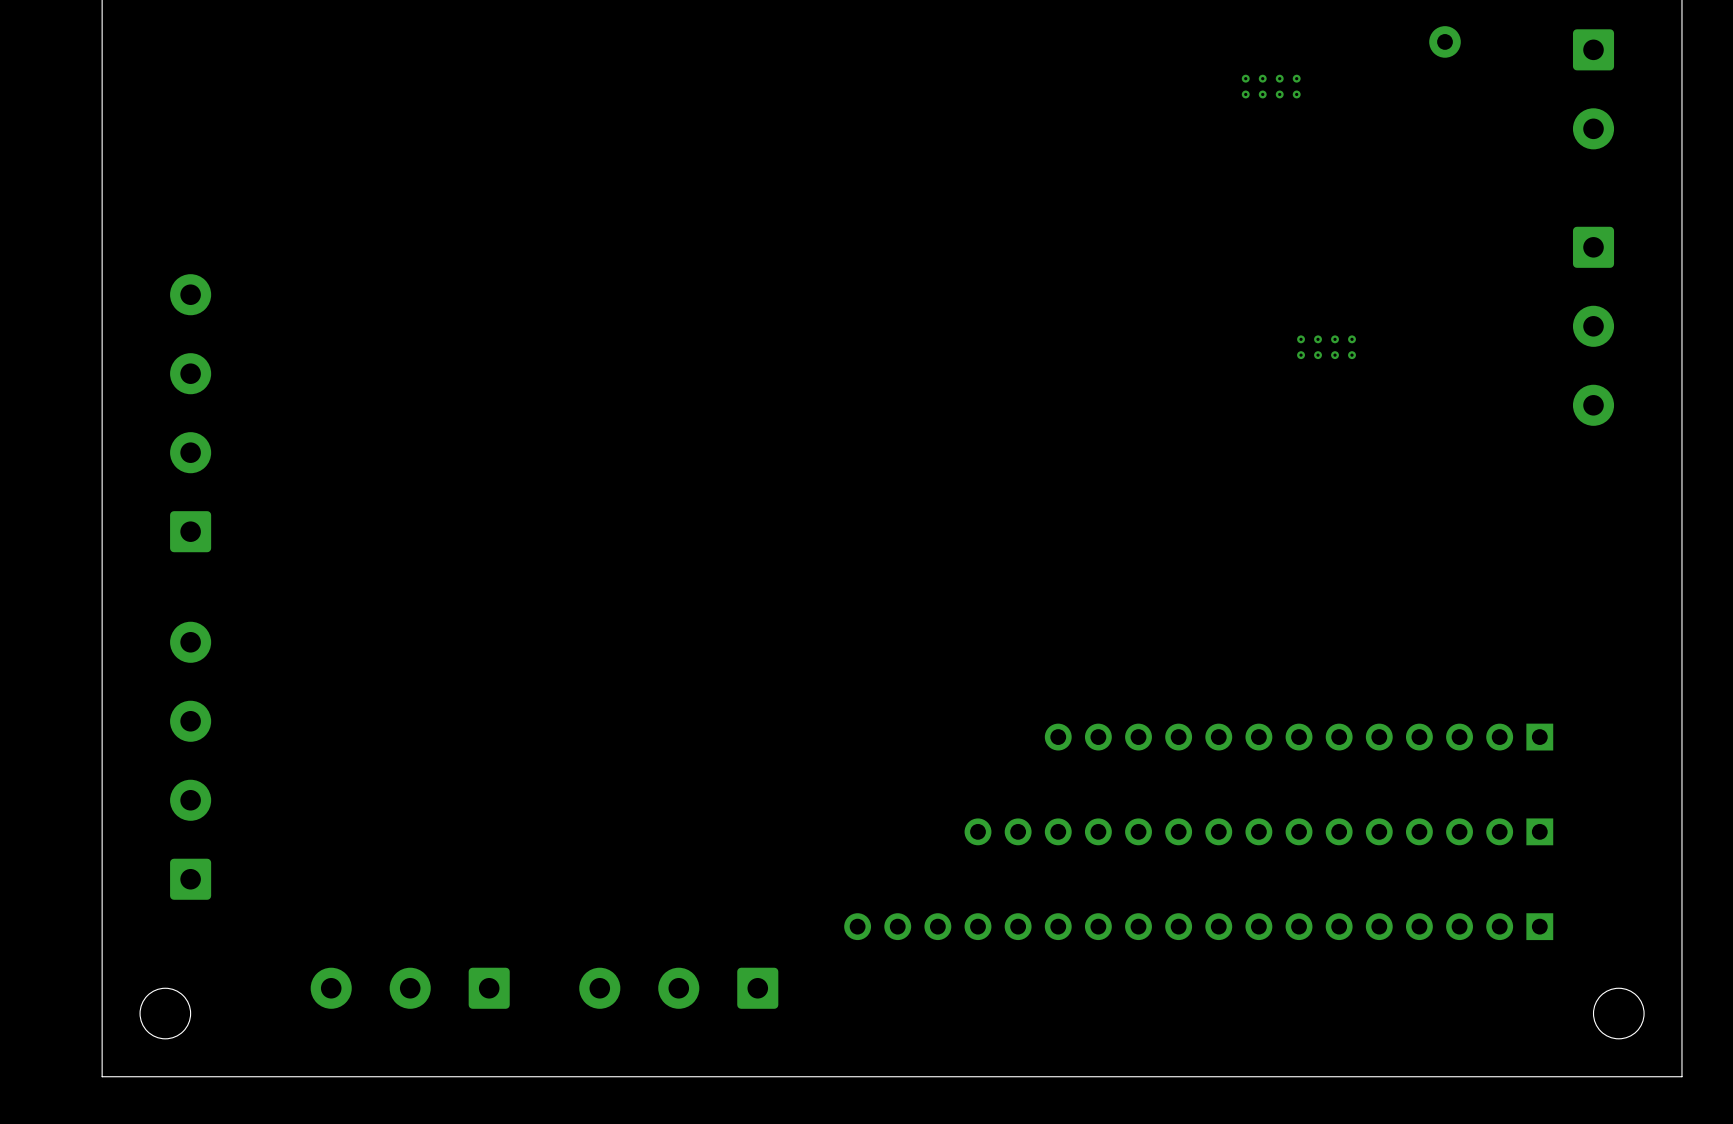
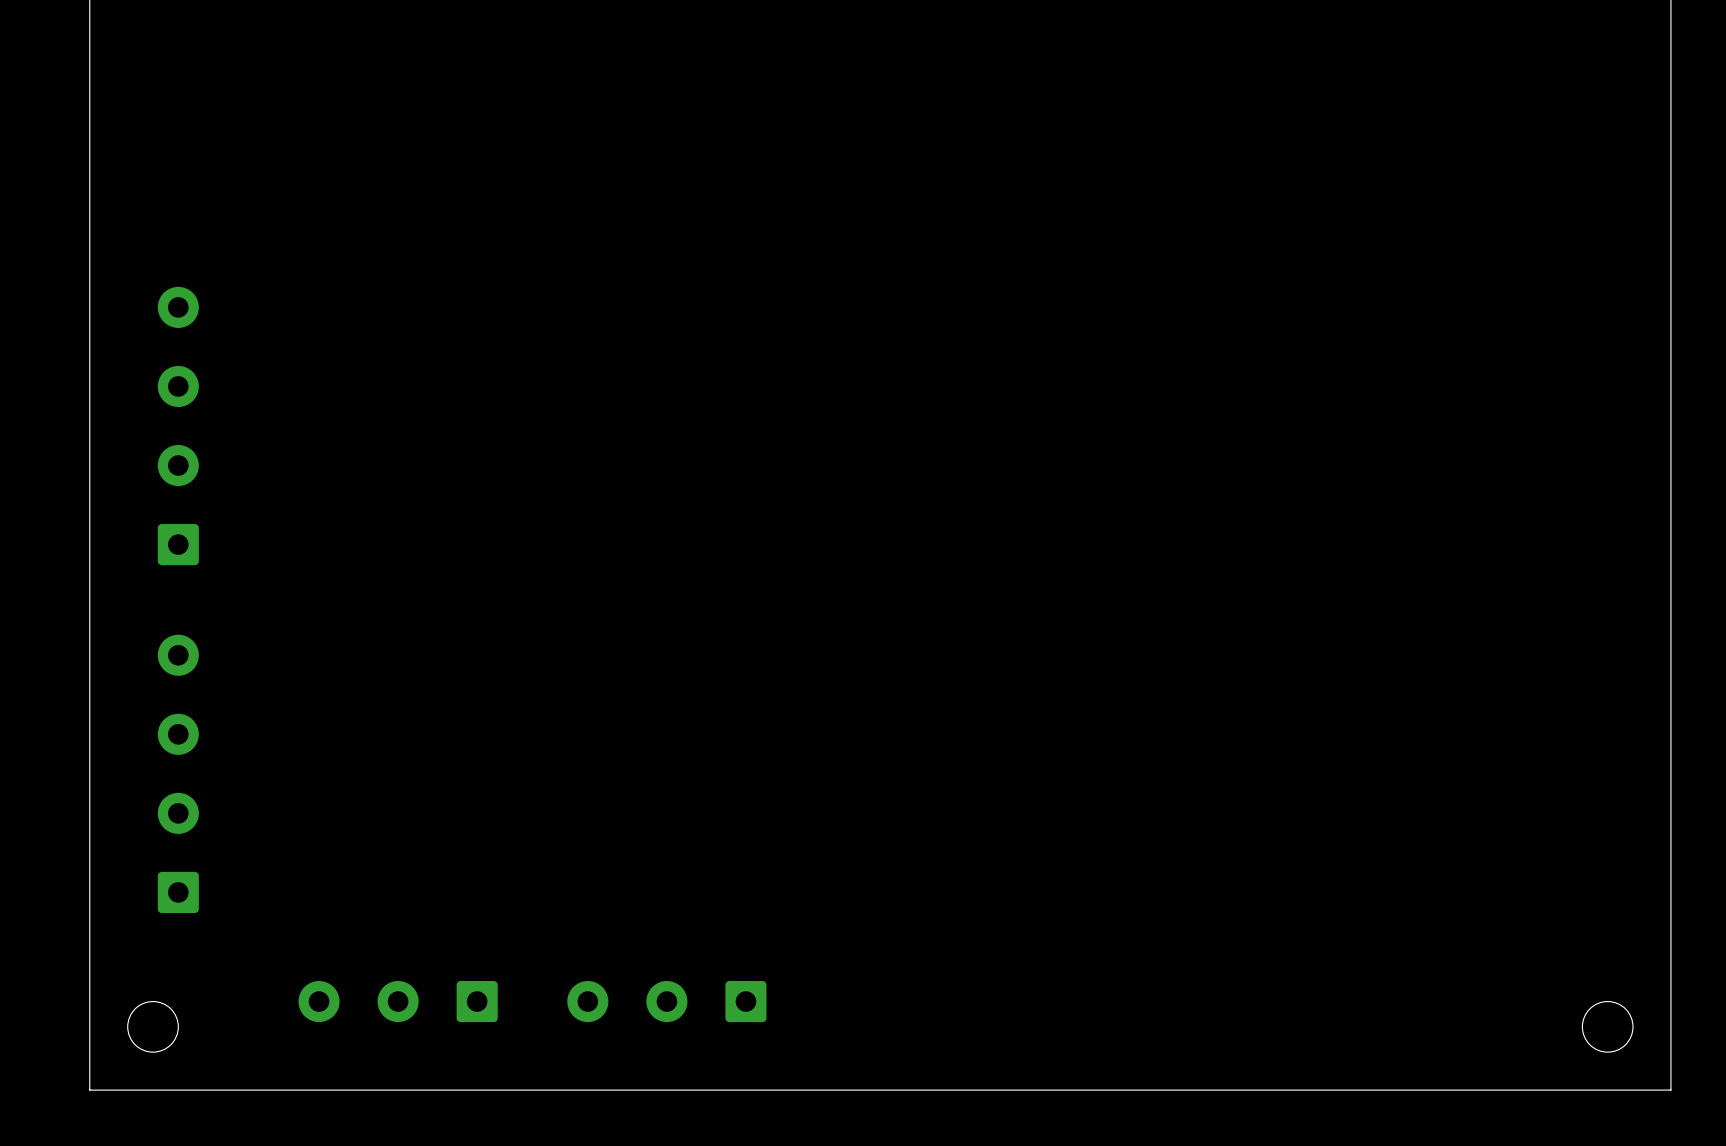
part: (1445, 41) -> none
part: (1271, 86) -> none
part: (1593, 89) -> none
part: (1593, 326) -> none
part: (1326, 347) -> none
part: (1299, 737) -> none
part: (1258, 831) -> none
part: (1198, 926) -> none

